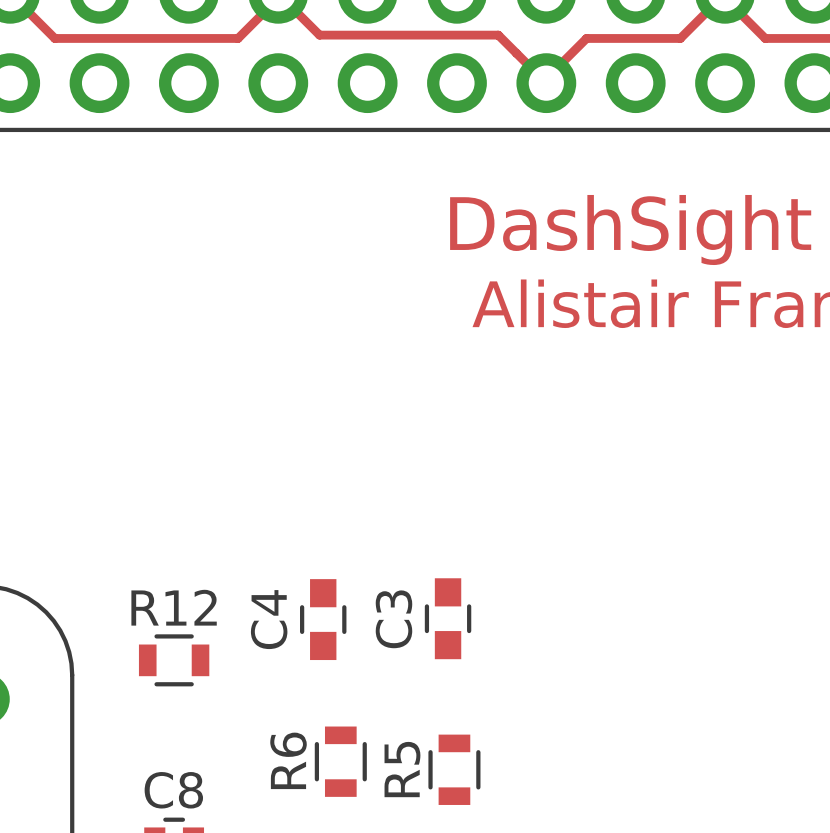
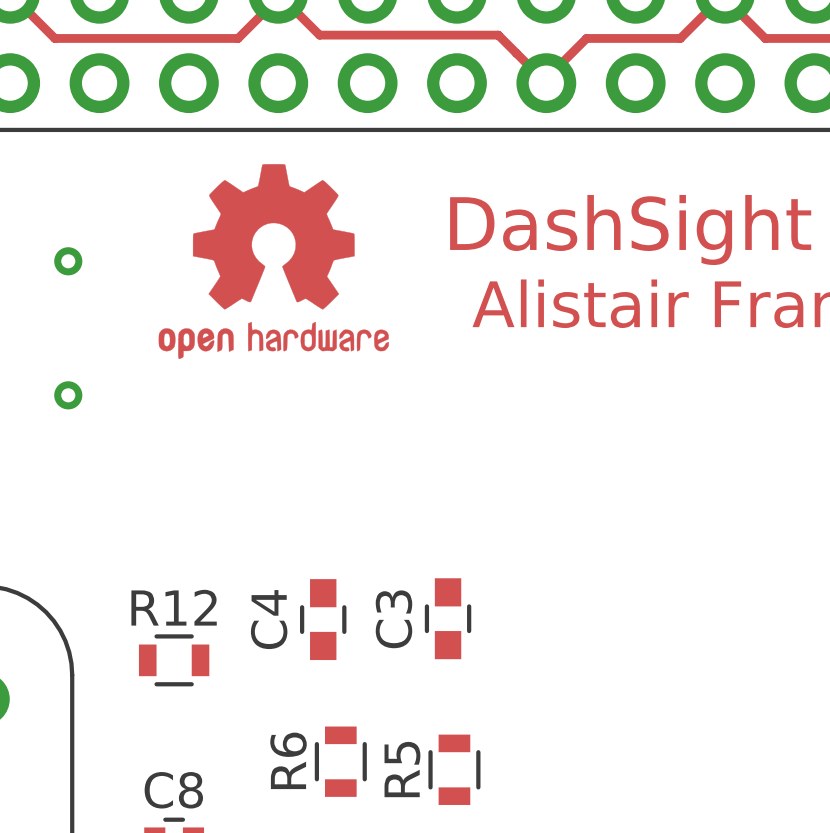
drawing: none -> [158, 164, 389, 359]
via: none -> (68, 261)
via: none -> (68, 395)

